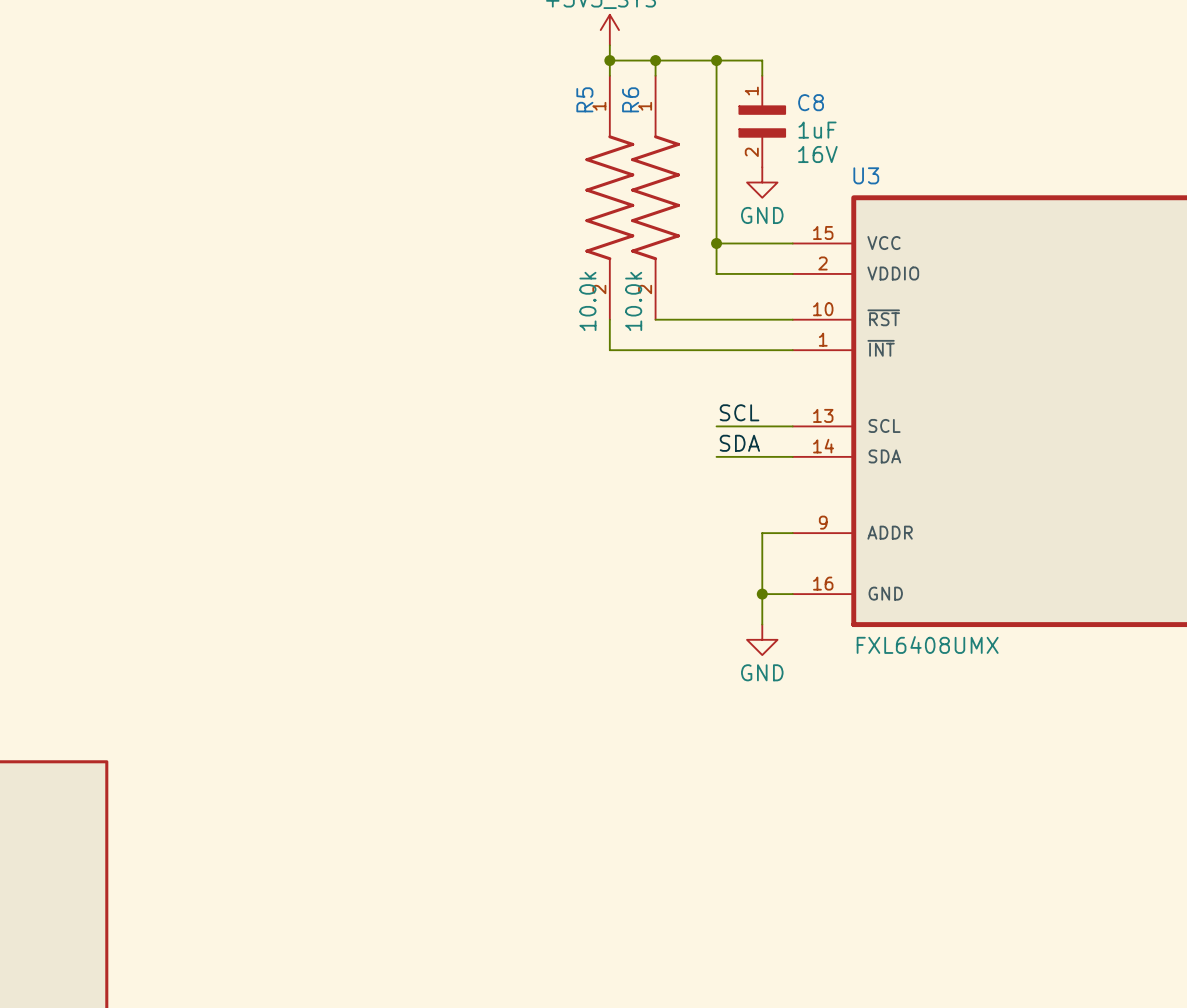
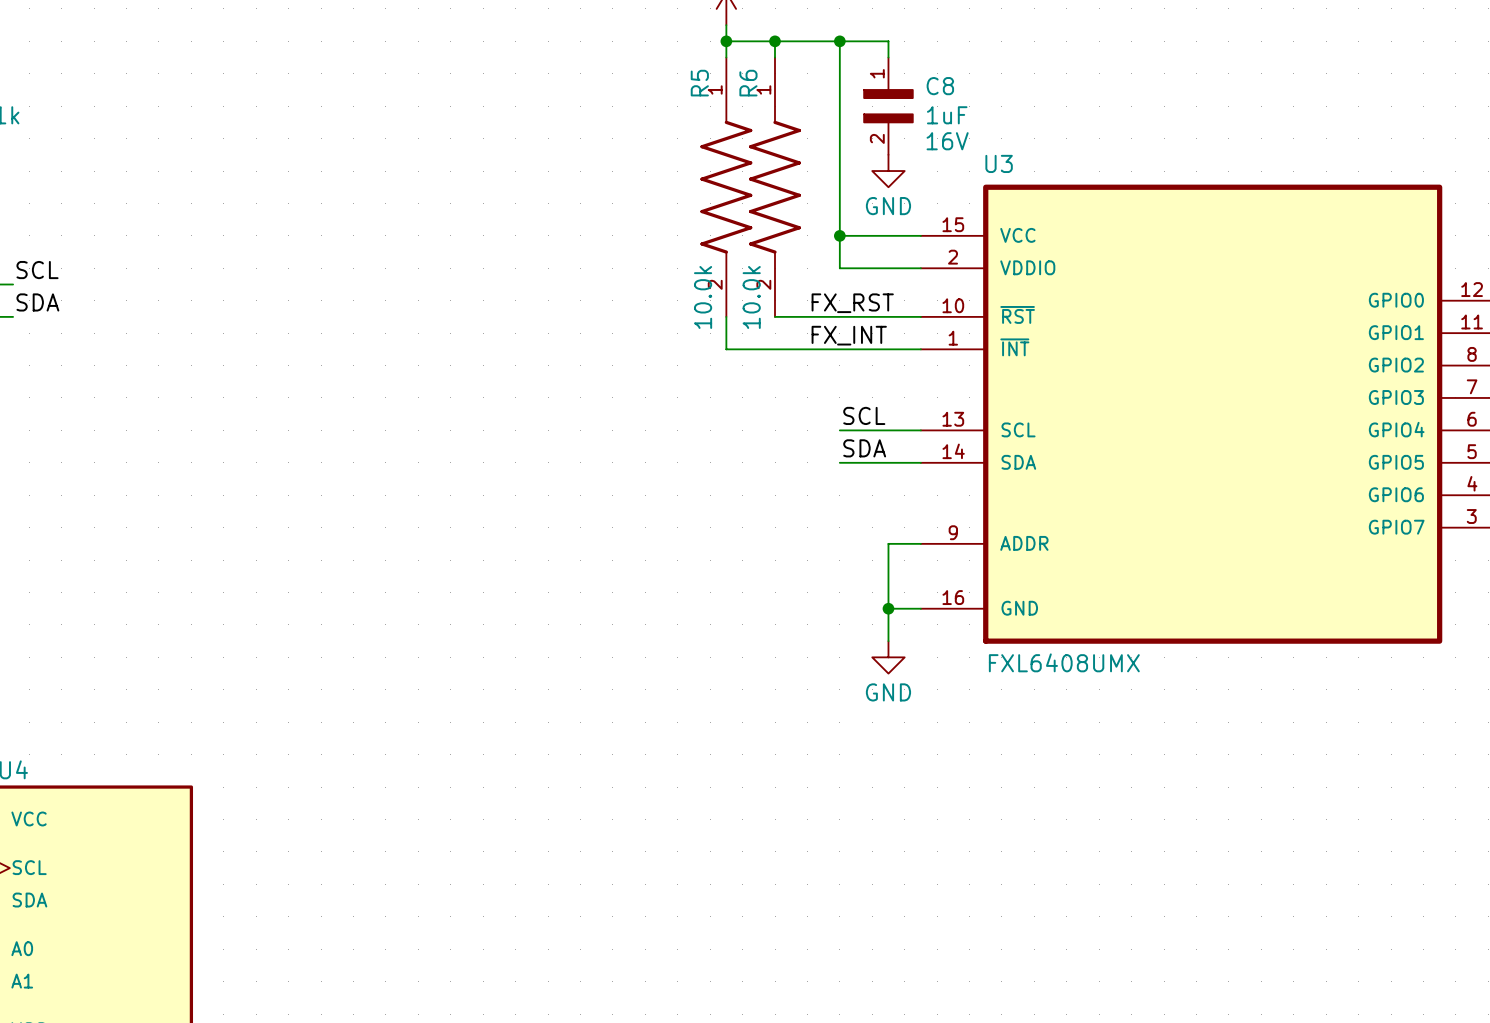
label: none -> FX_RST (852, 303)
label: none -> FX_INT (849, 335)

